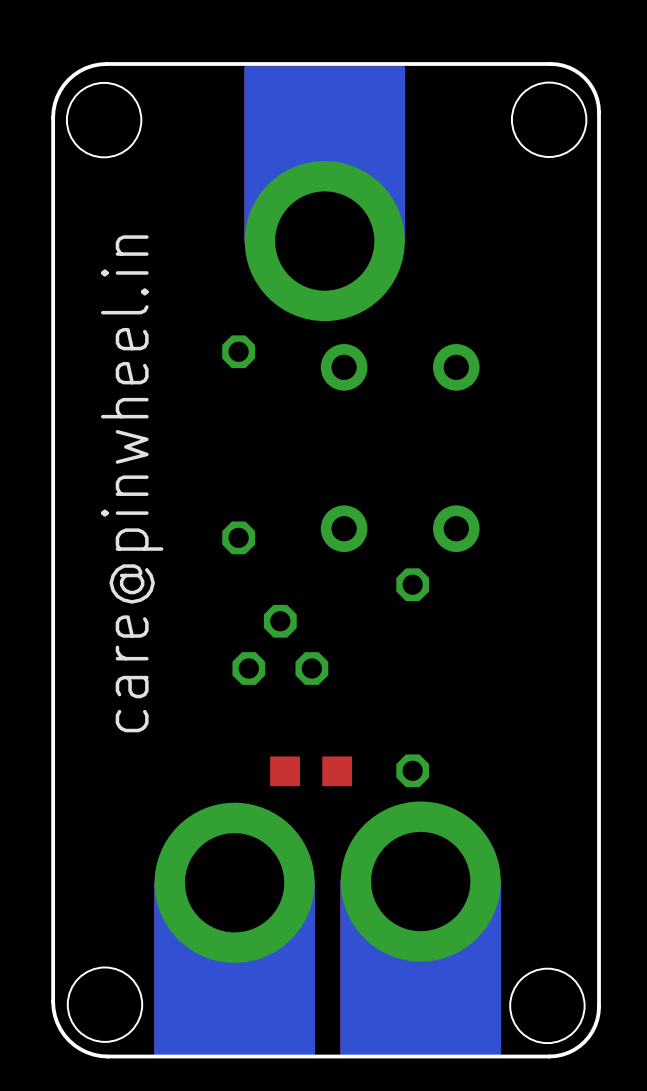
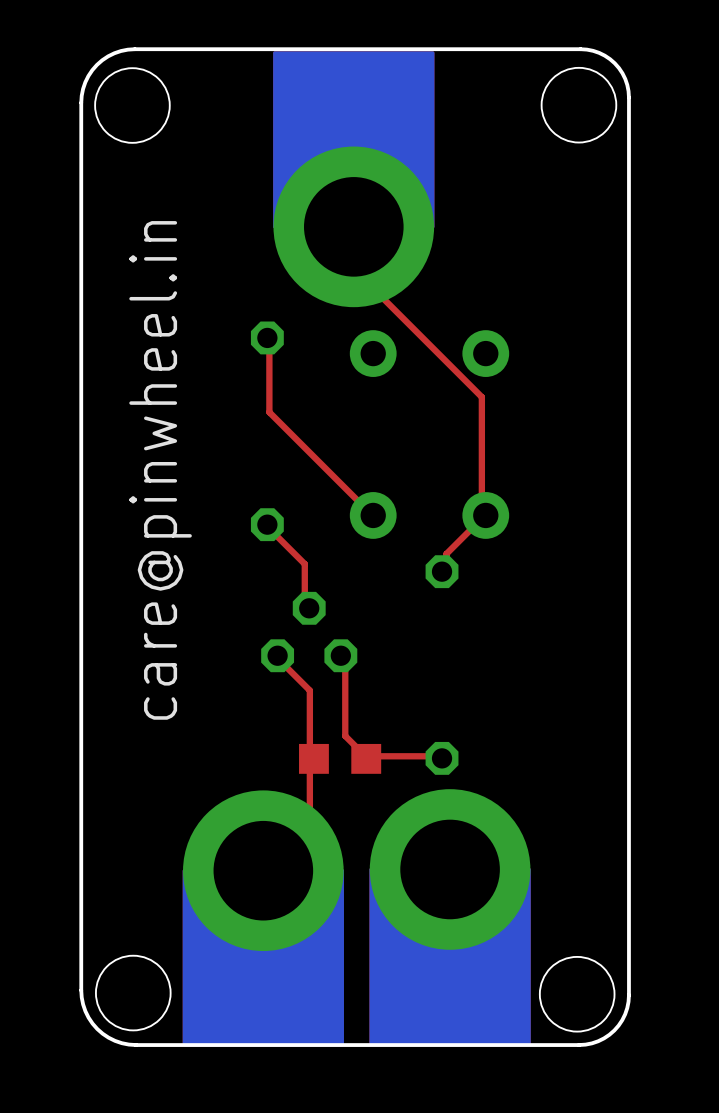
top track: none -> (353, 226) (355, 270) (481, 397) (481, 513) (485, 515) (446, 553) (446, 569) (442, 571)
top track: none -> (267, 337) (269, 341) (269, 412) (373, 515)
top track: none -> (267, 524) (304, 564) (304, 604) (309, 608)
top track: none -> (277, 655) (279, 660) (309, 690) (309, 756) (313, 758) (309, 761) (309, 822)
top track: none -> (340, 655) (345, 660) (345, 736) (366, 758) (370, 756) (441, 756) (442, 758)

